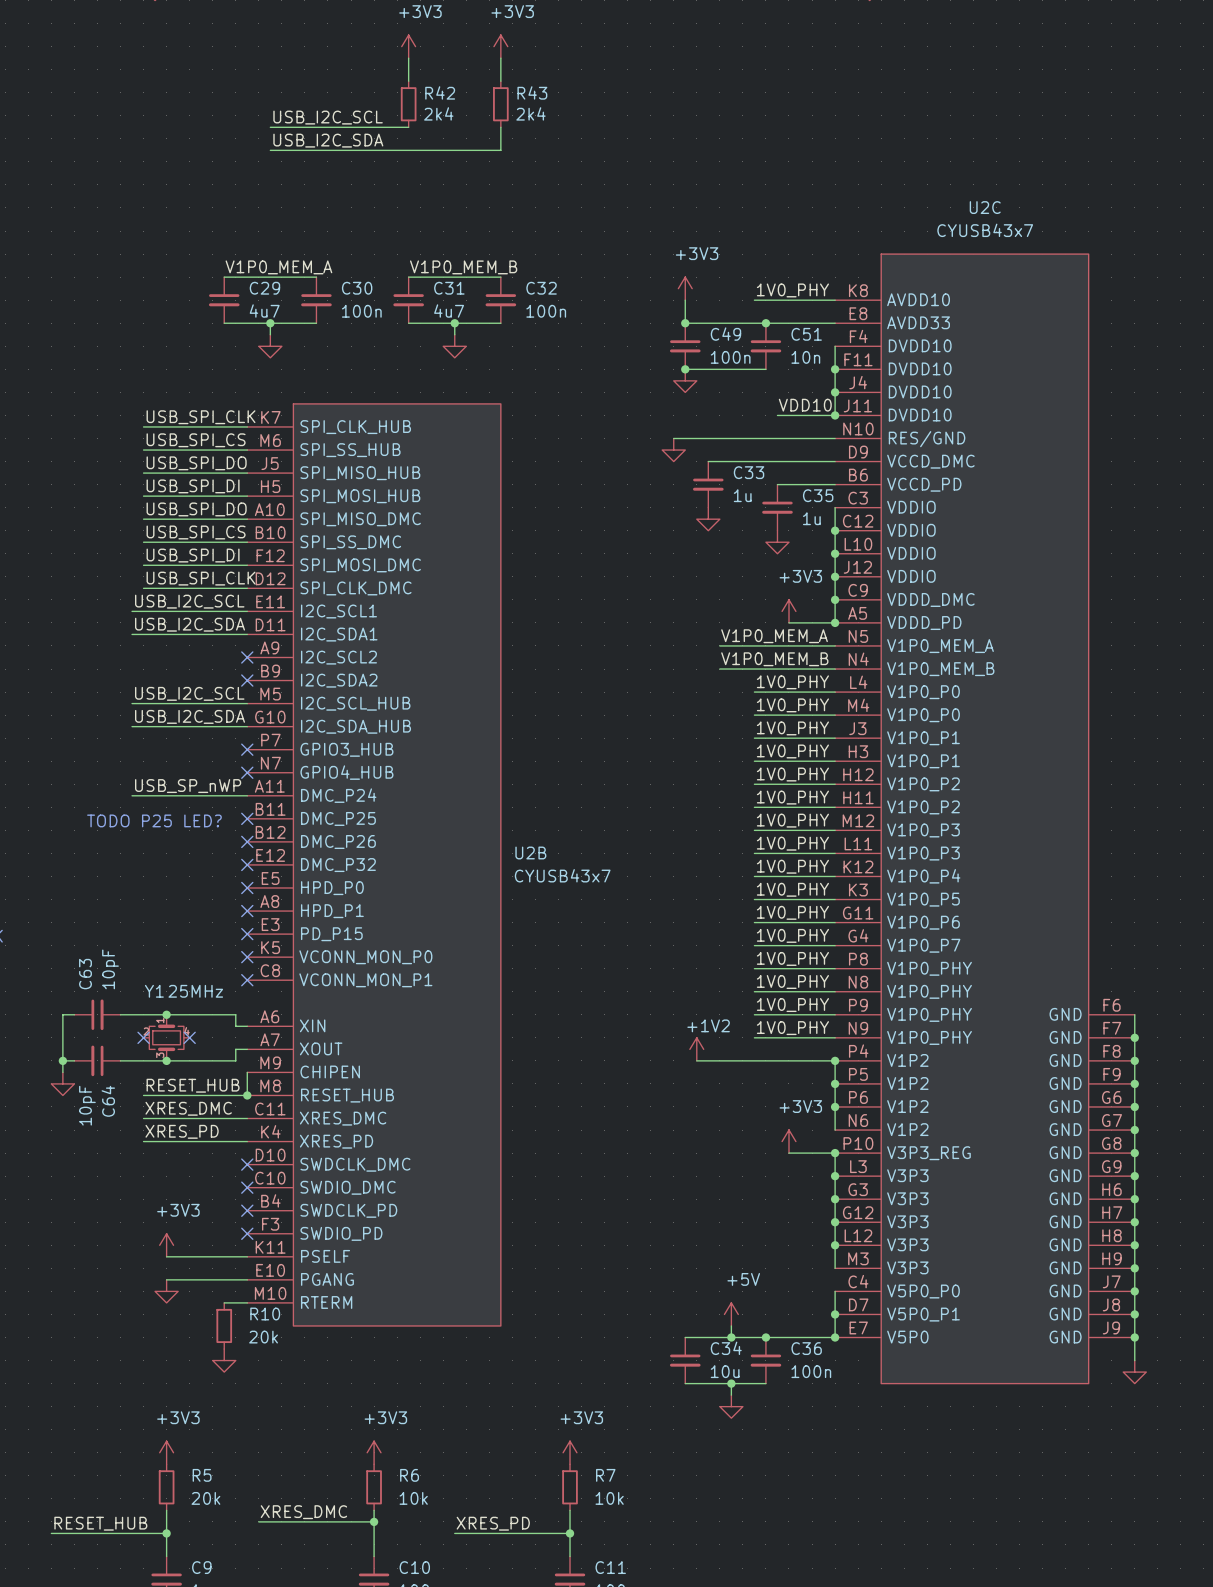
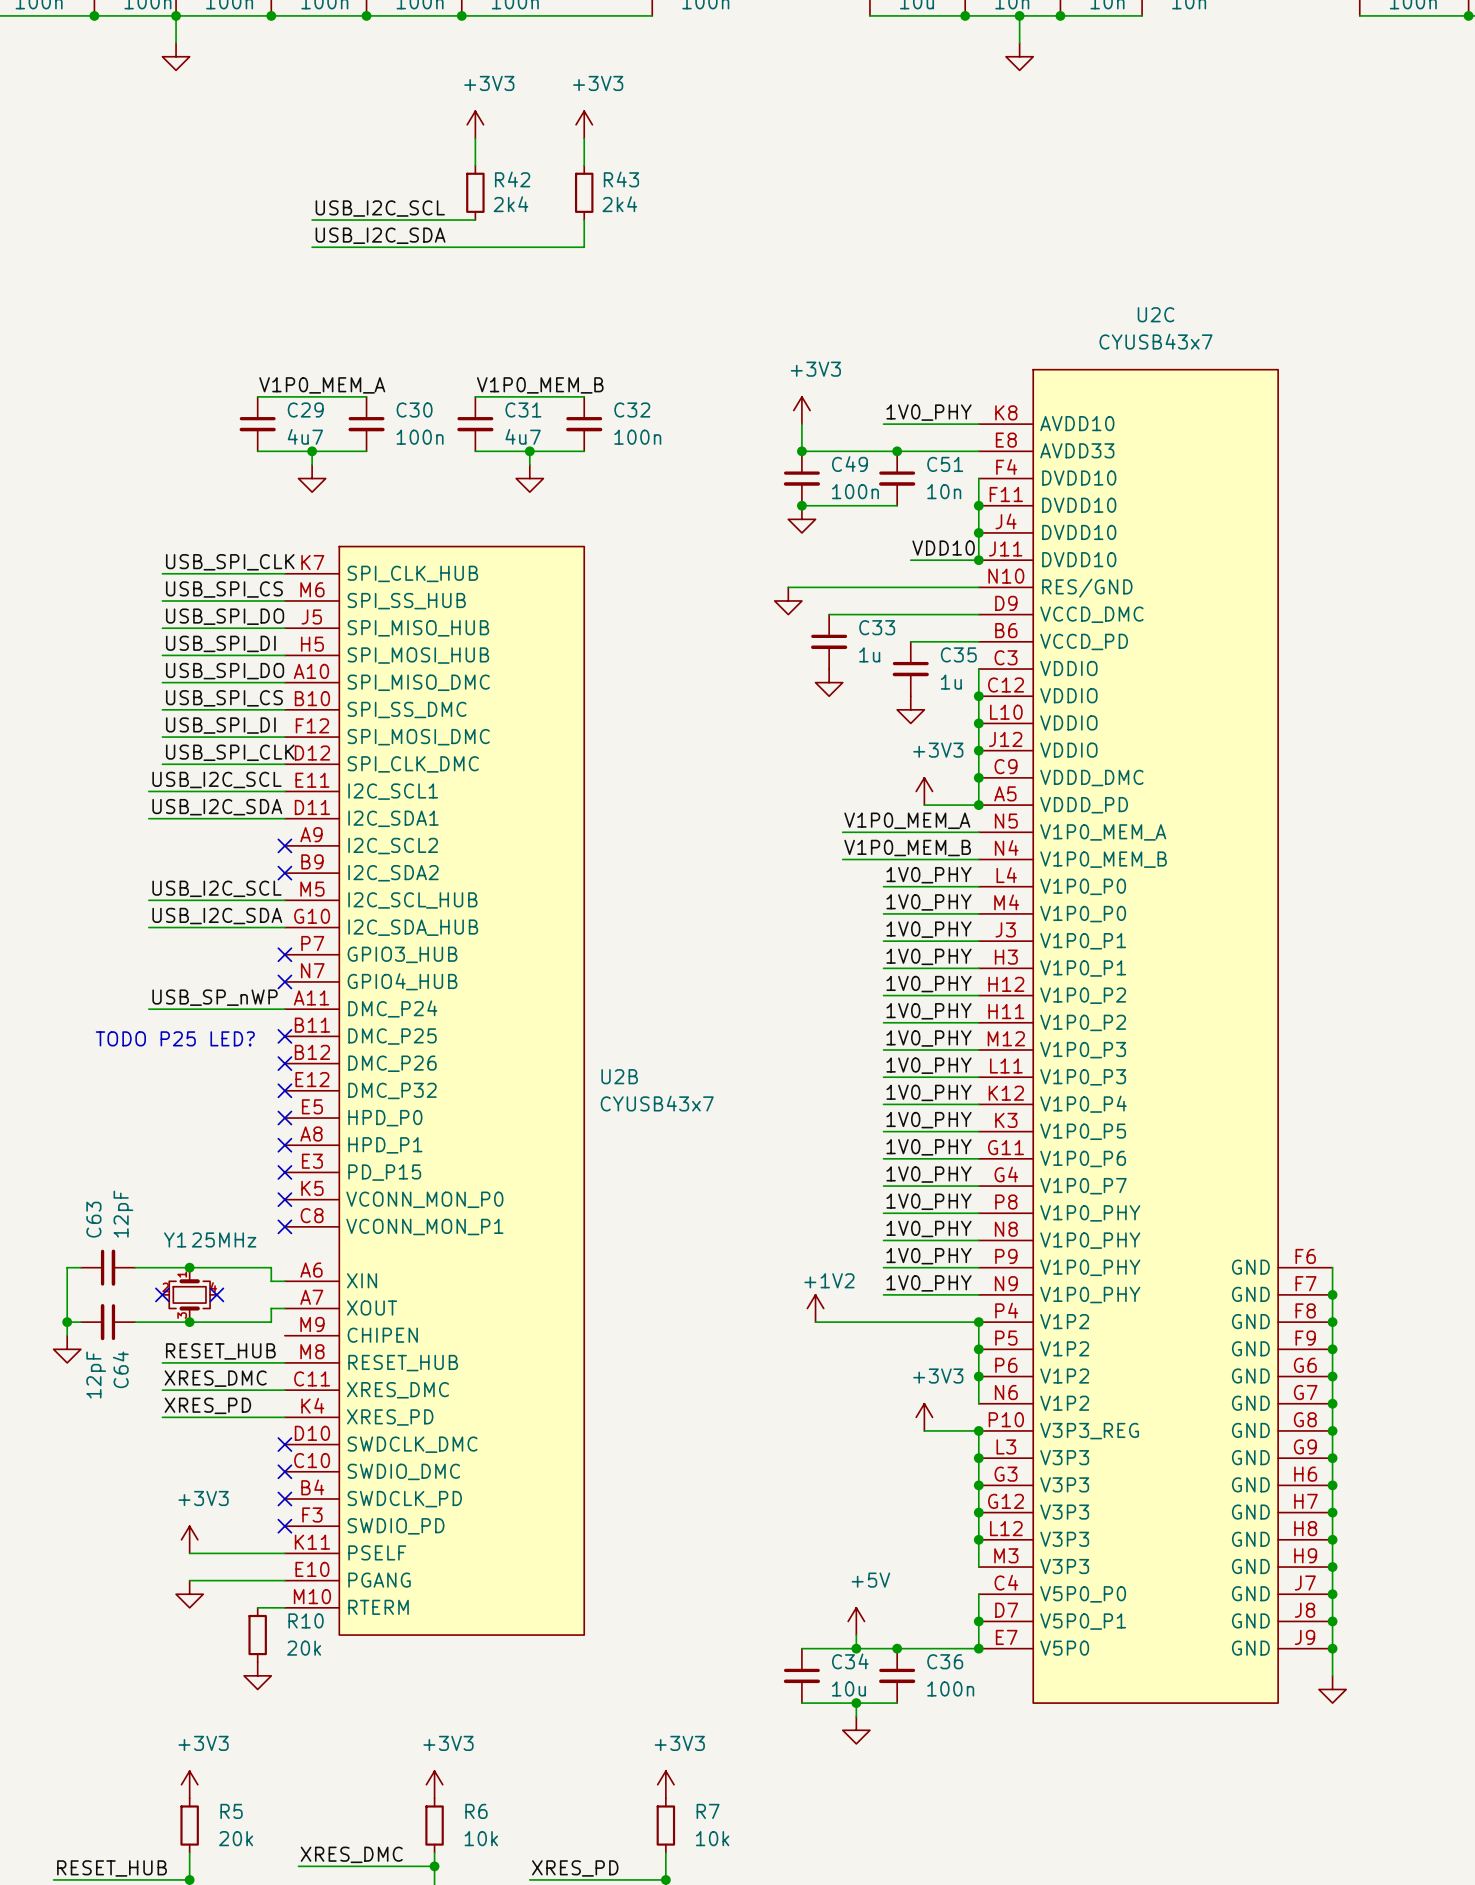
C63 value: 10pF (110, 969) -> 12pF (123, 1214)
wire: (247, 1072) (247, 1095) -> none
junction: (247, 1095) -> none
C64 value: 10pF (87, 1105) -> 12pF (96, 1375)

